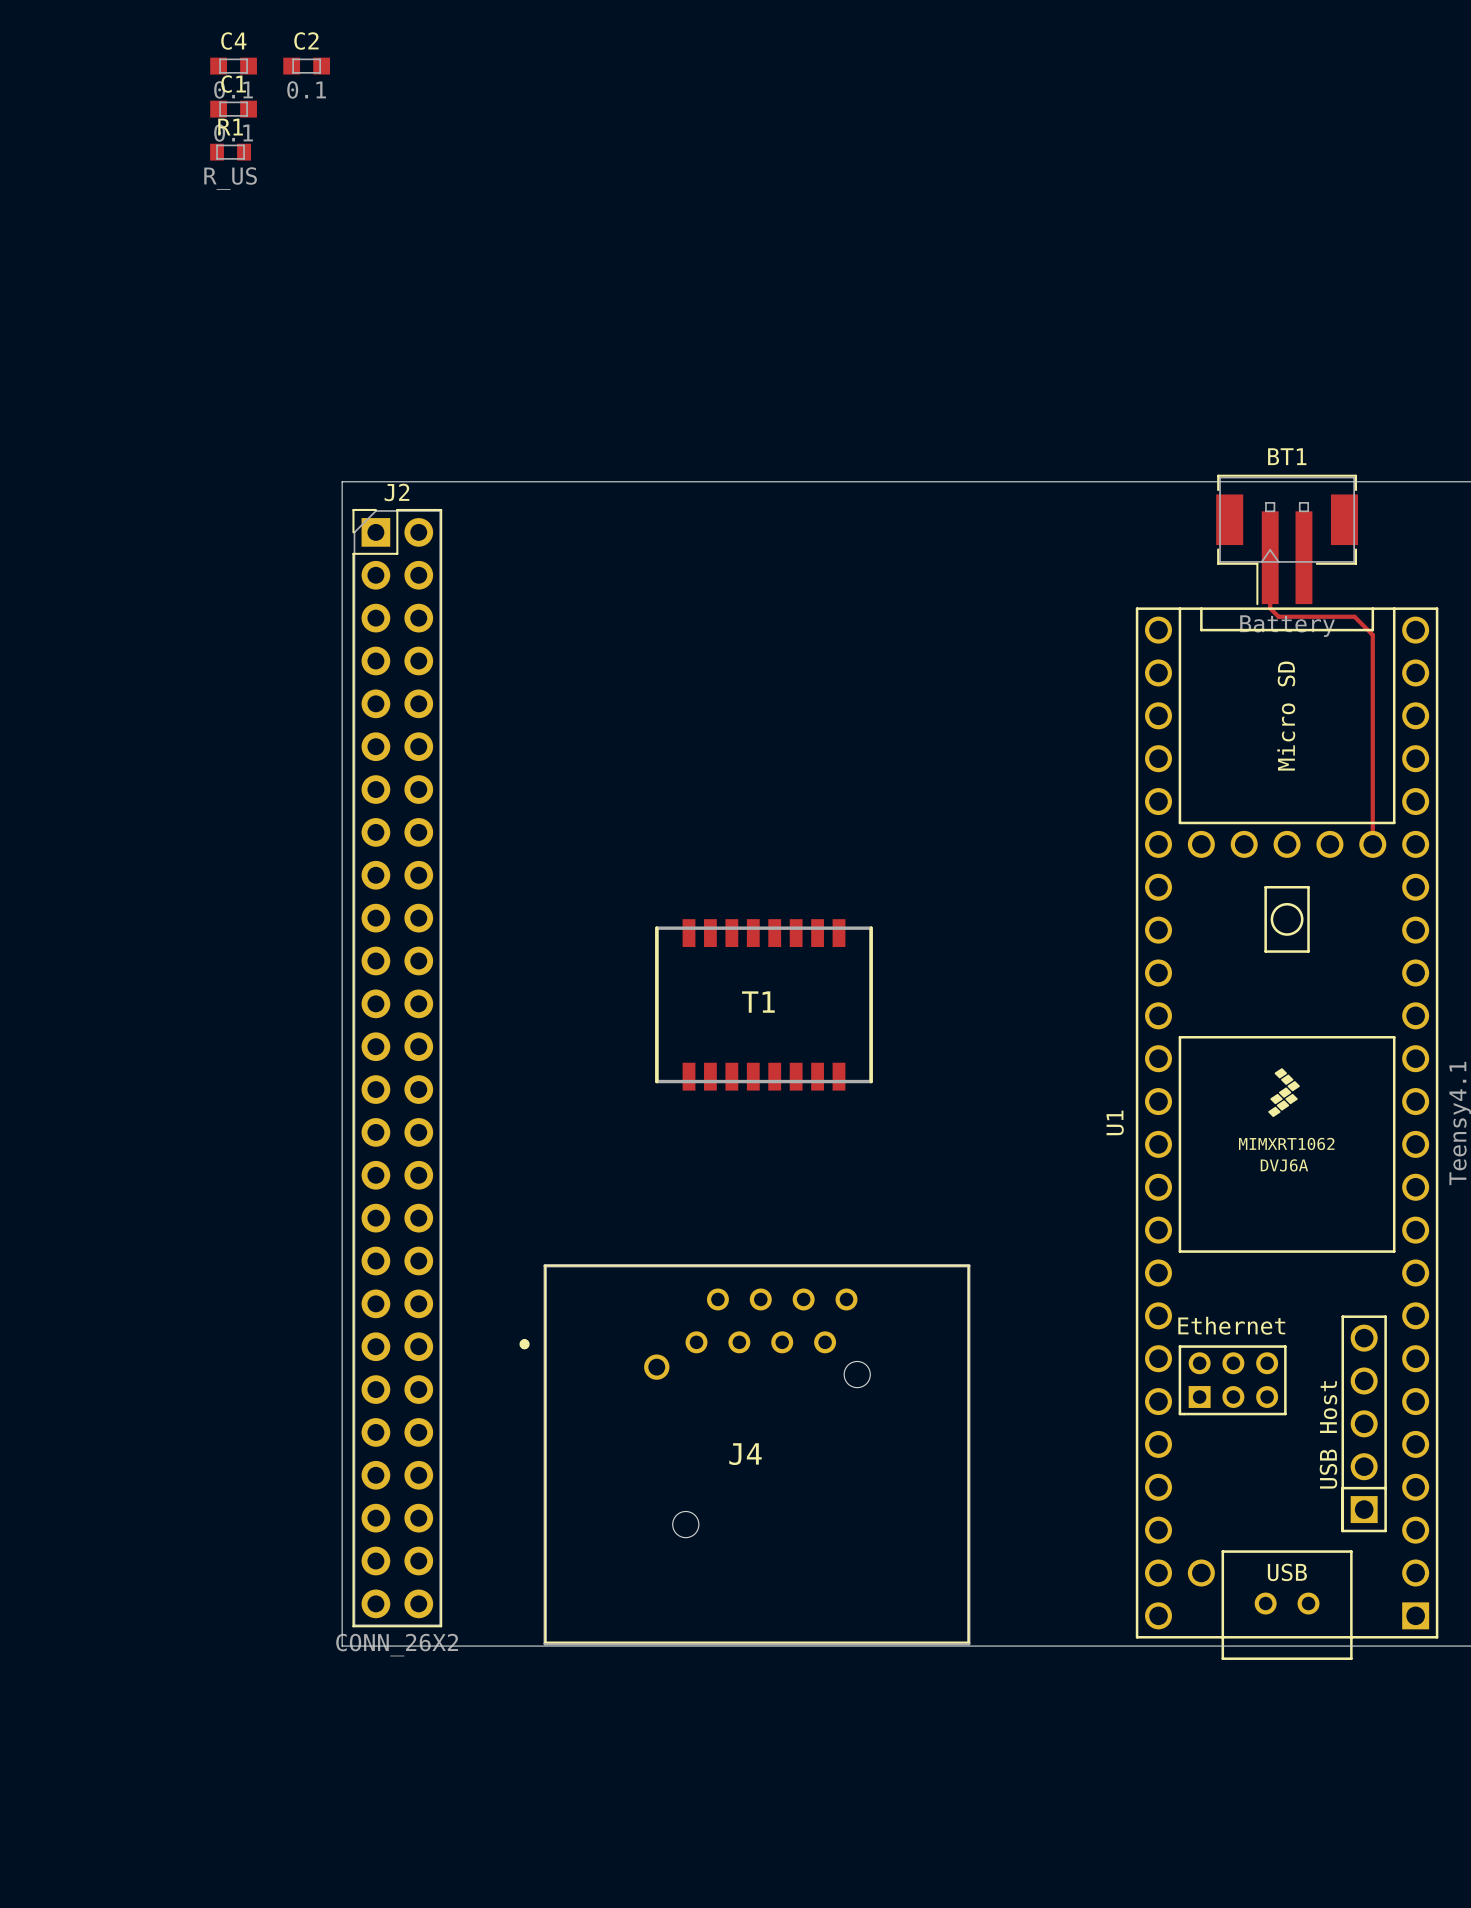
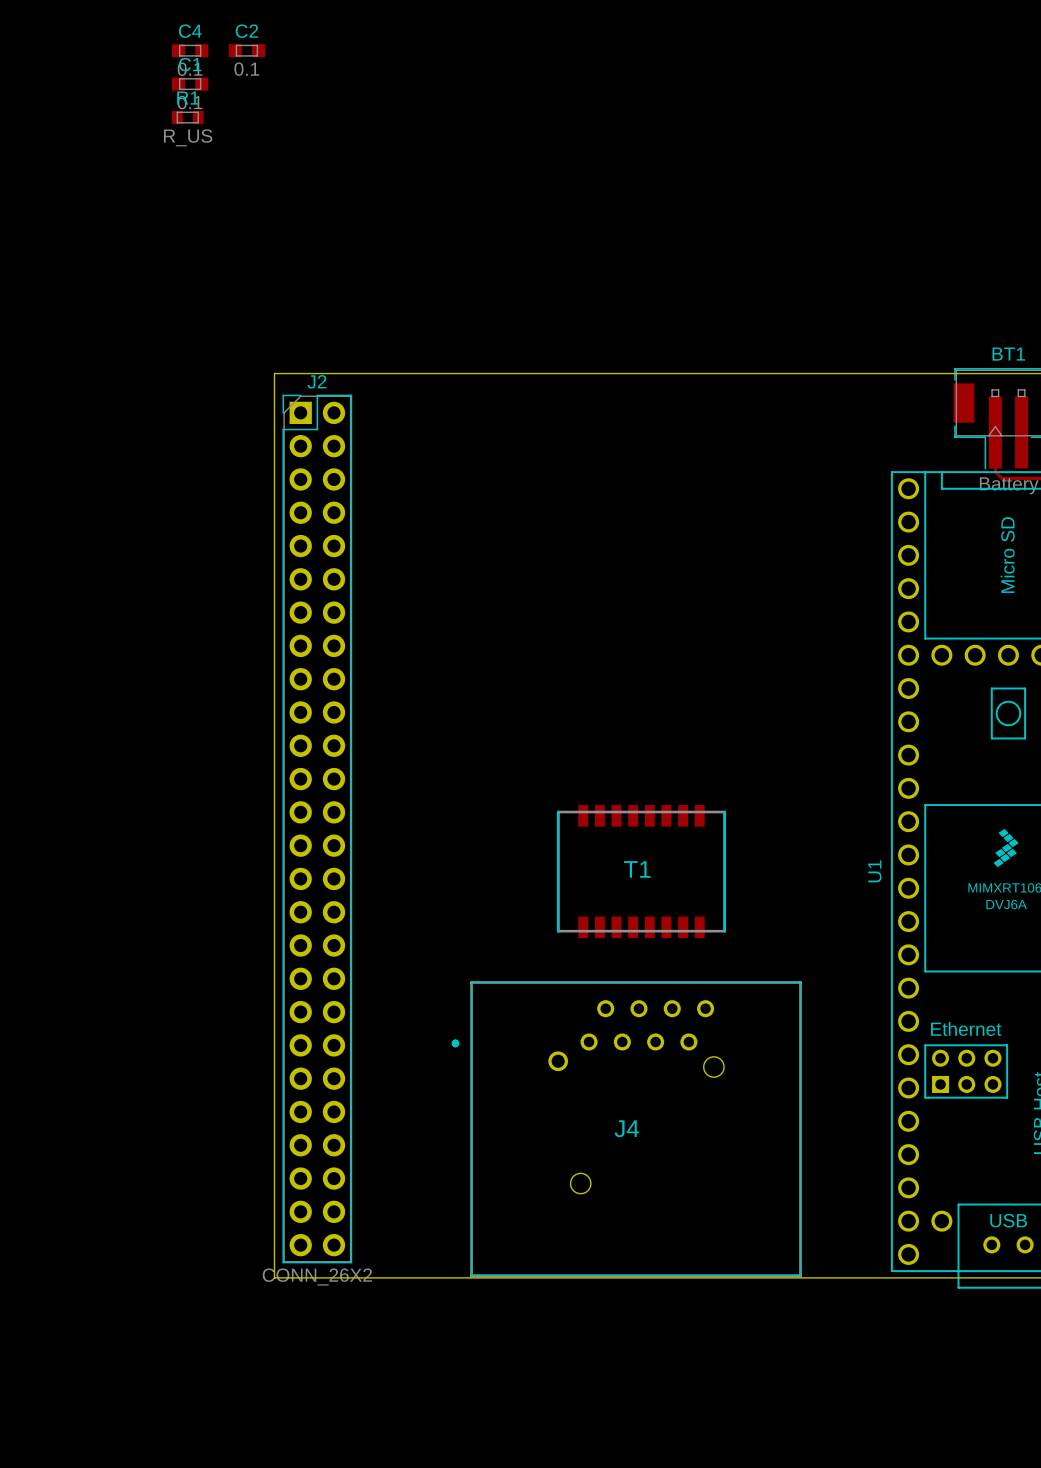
T1 position: (764, 1004) -> (641, 871)
J4 position: (744, 1454) -> (626, 1129)

